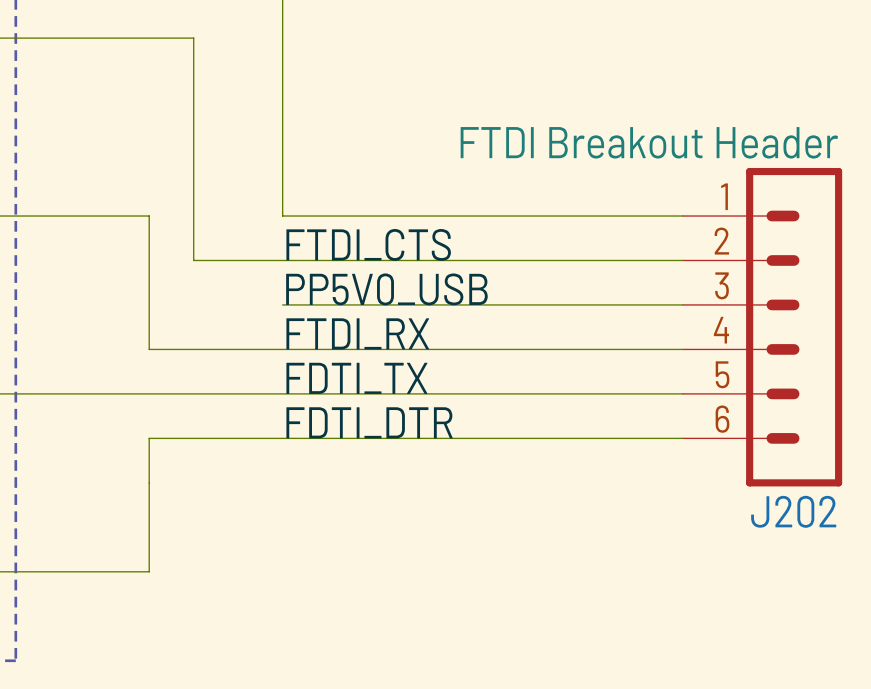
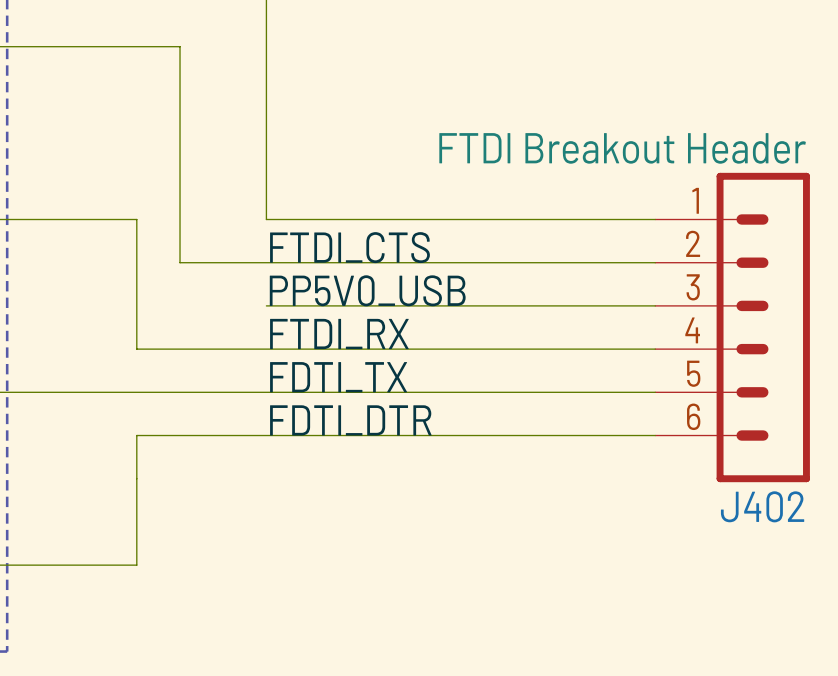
J202 name: J202 (793, 511) -> J402 (762, 506)

